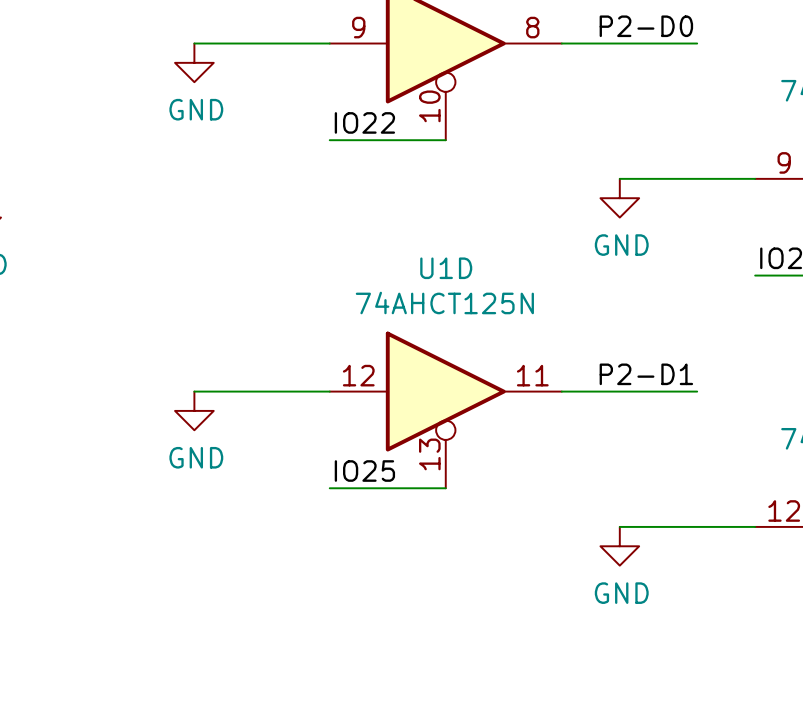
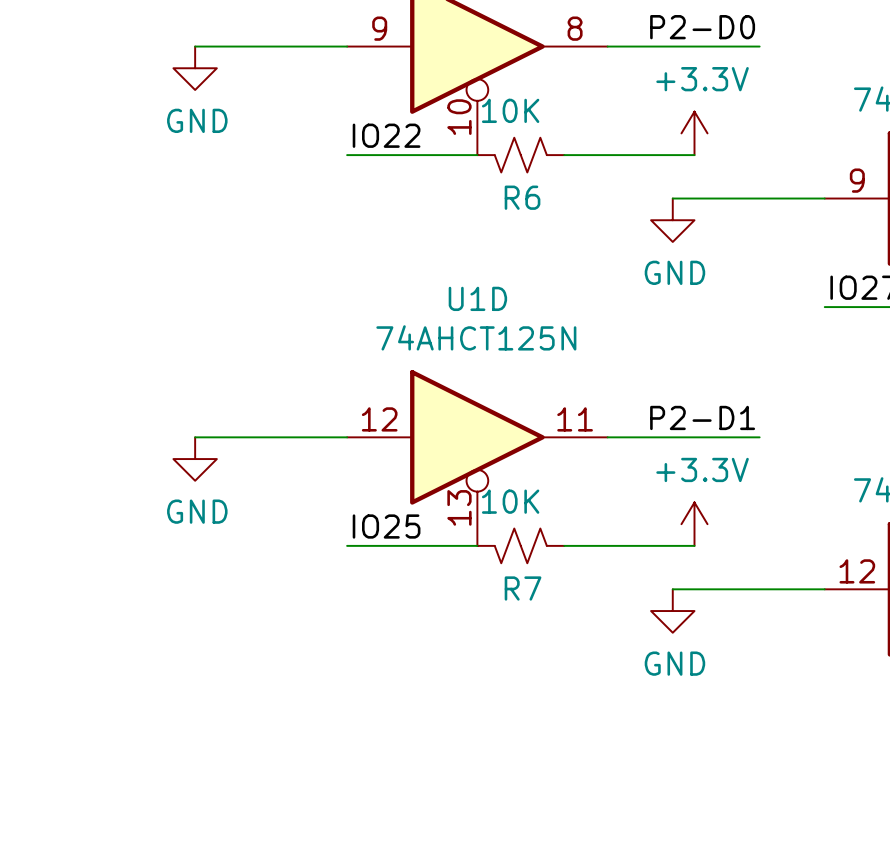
power symbol: none -> +3.3V (694, 133)
R6: none -> 10K (520, 155)
wire: none -> (564, 155) (694, 155)
power symbol: none -> +3.3V (694, 524)
R7: none -> 10K (520, 545)
wire: none -> (564, 545) (694, 545)

